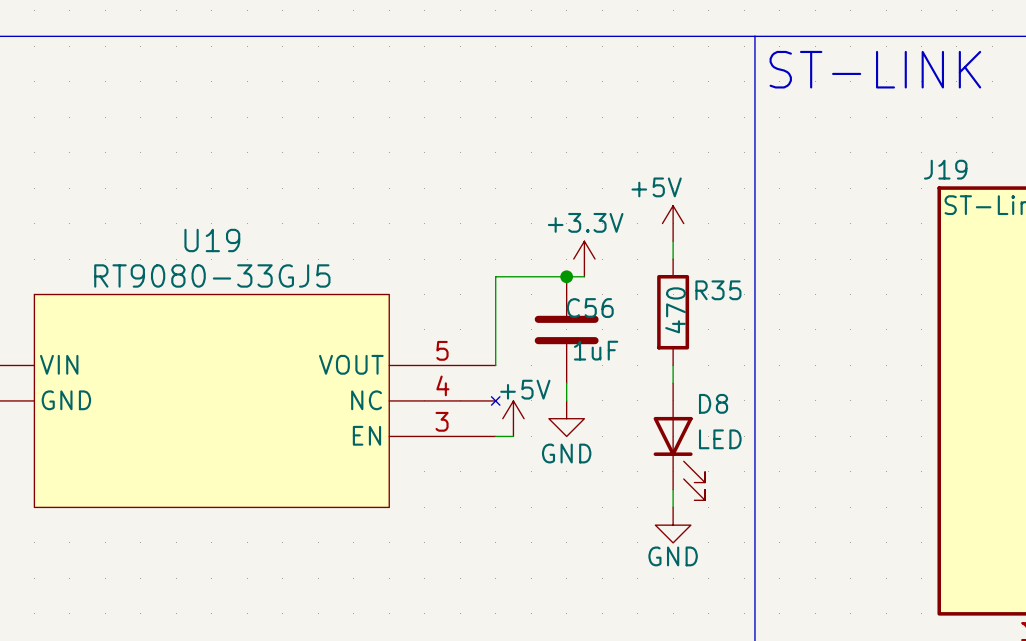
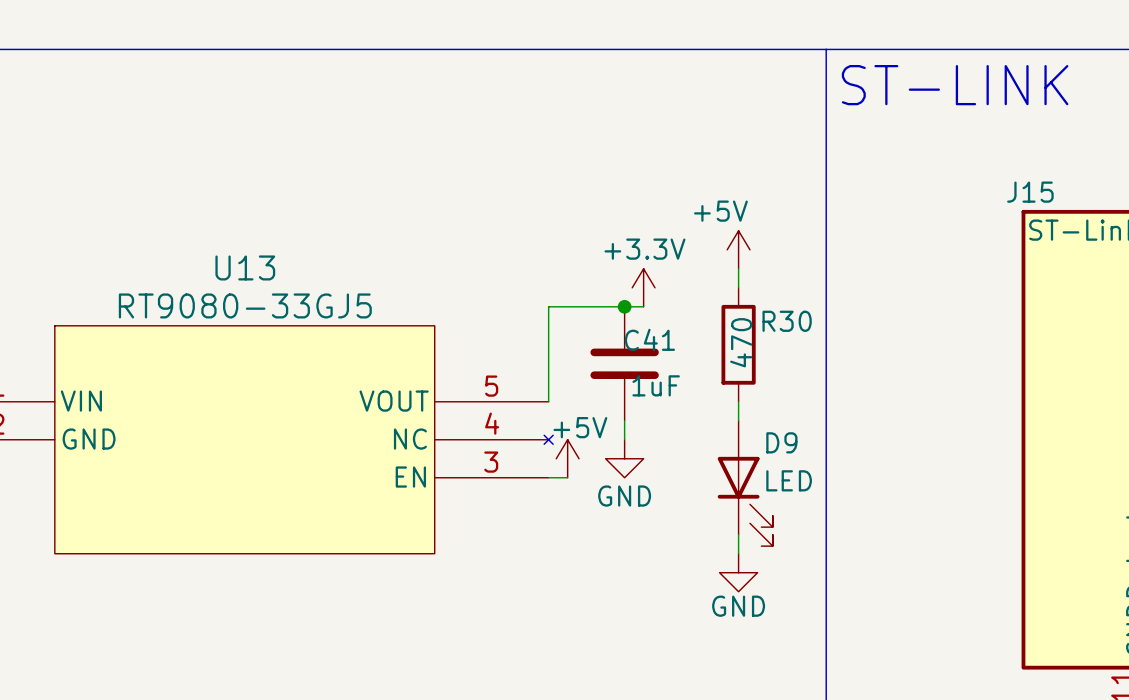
J19 name: J19 (945, 169) -> J15 (1030, 192)
U19 name: U19 (212, 240) -> U13 (245, 267)
R35 name: R35 (718, 290) -> R30 (787, 321)
C56 name: C56 (590, 308) -> C41 (649, 339)
D8 name: D8 (713, 403) -> D9 (781, 442)

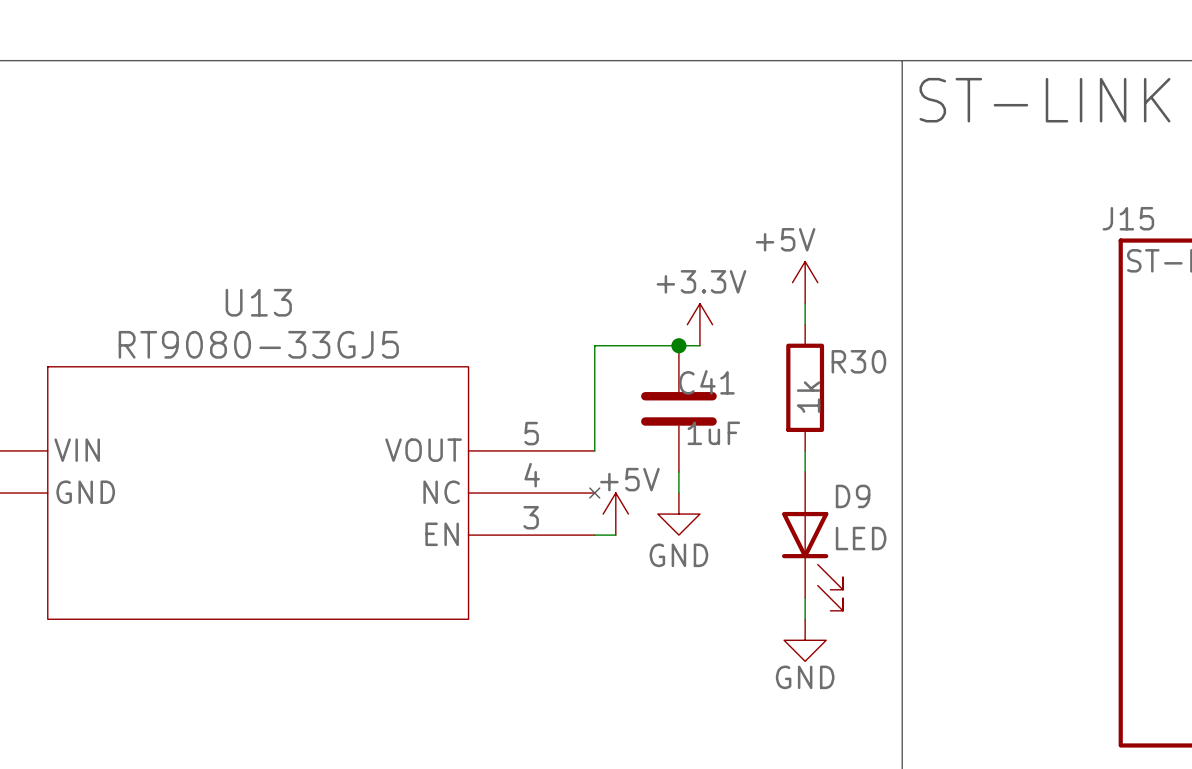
R30 value: 470 (741, 342) -> 1k (808, 397)

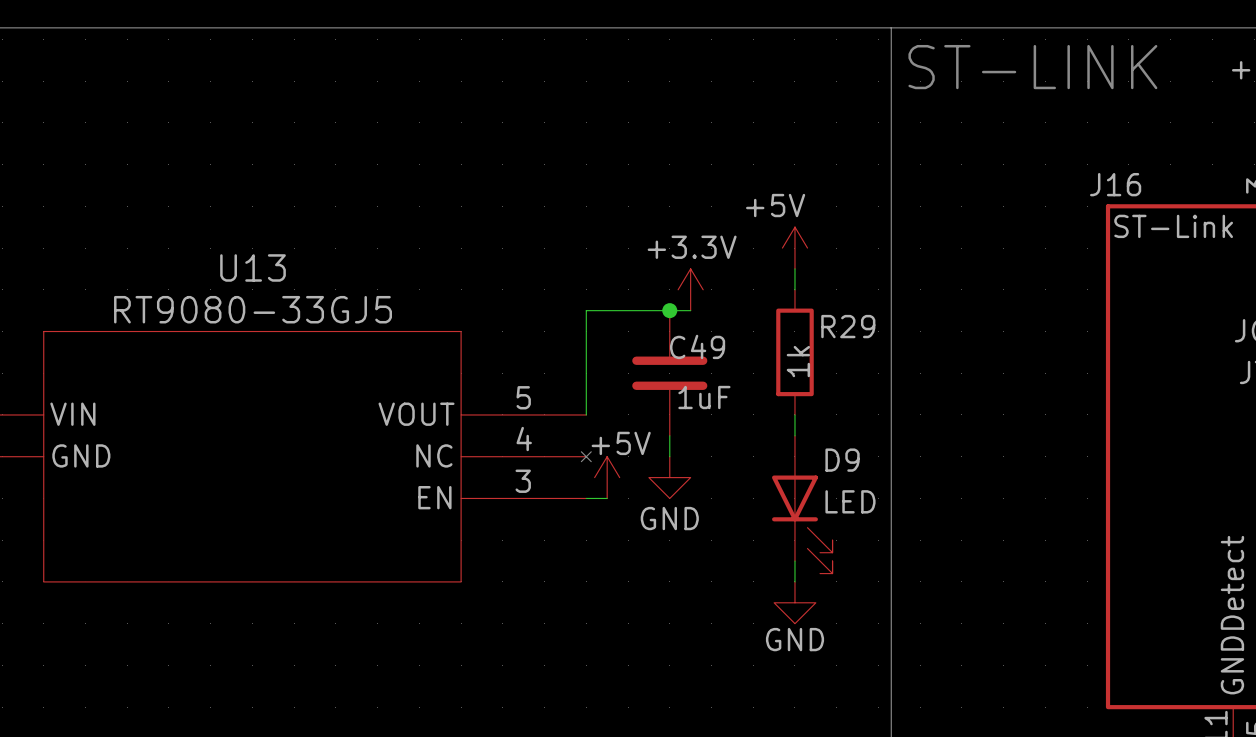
J15 name: J15 (1128, 218) -> J16 (1115, 184)
R30 name: R30 (858, 361) -> R29 (848, 326)
C41 name: C41 (706, 382) -> C49 (697, 346)

